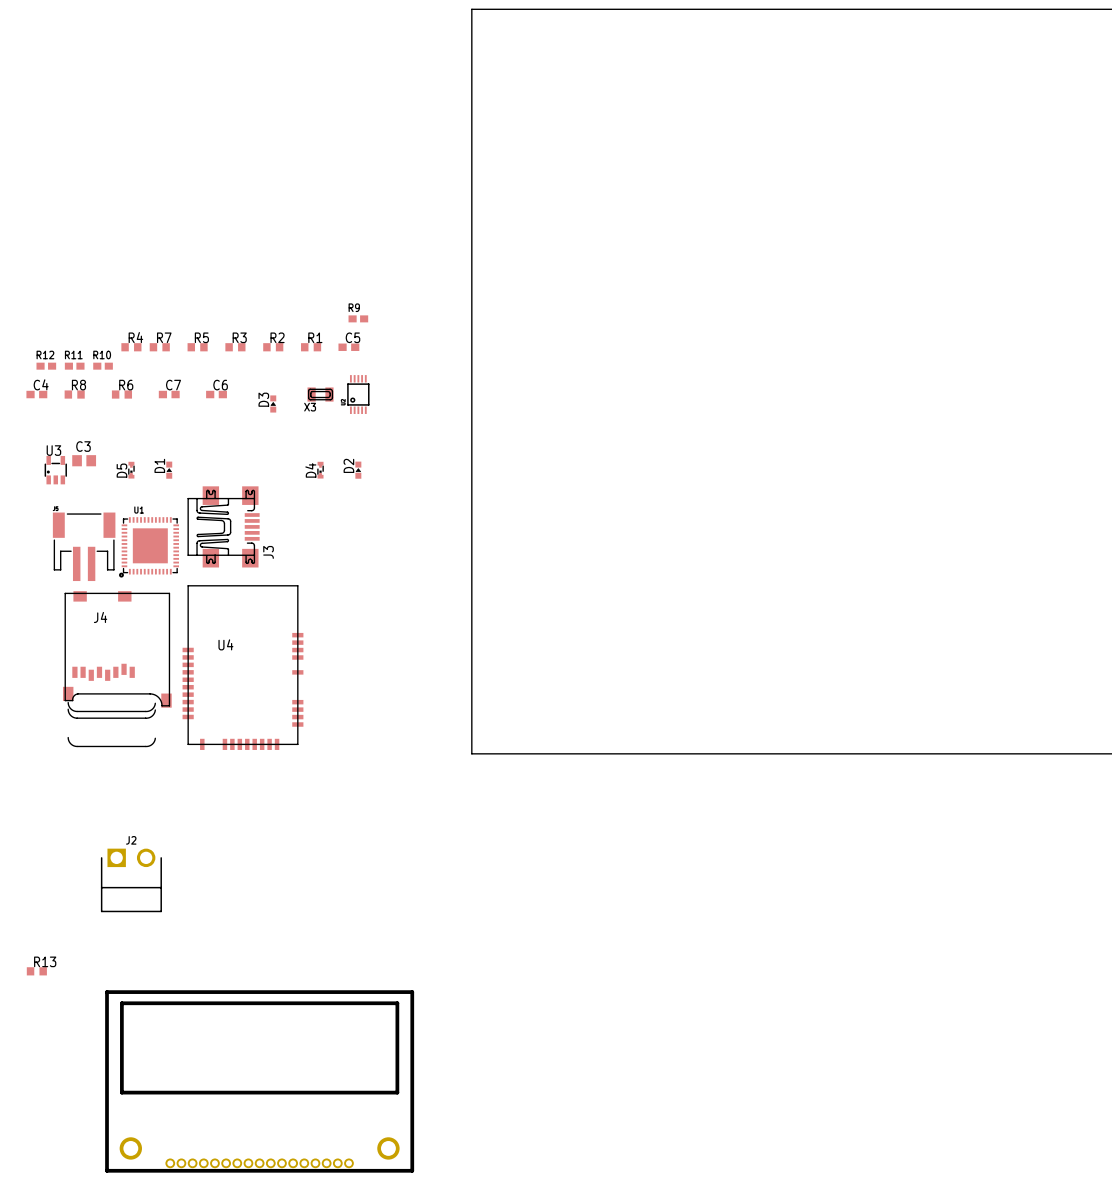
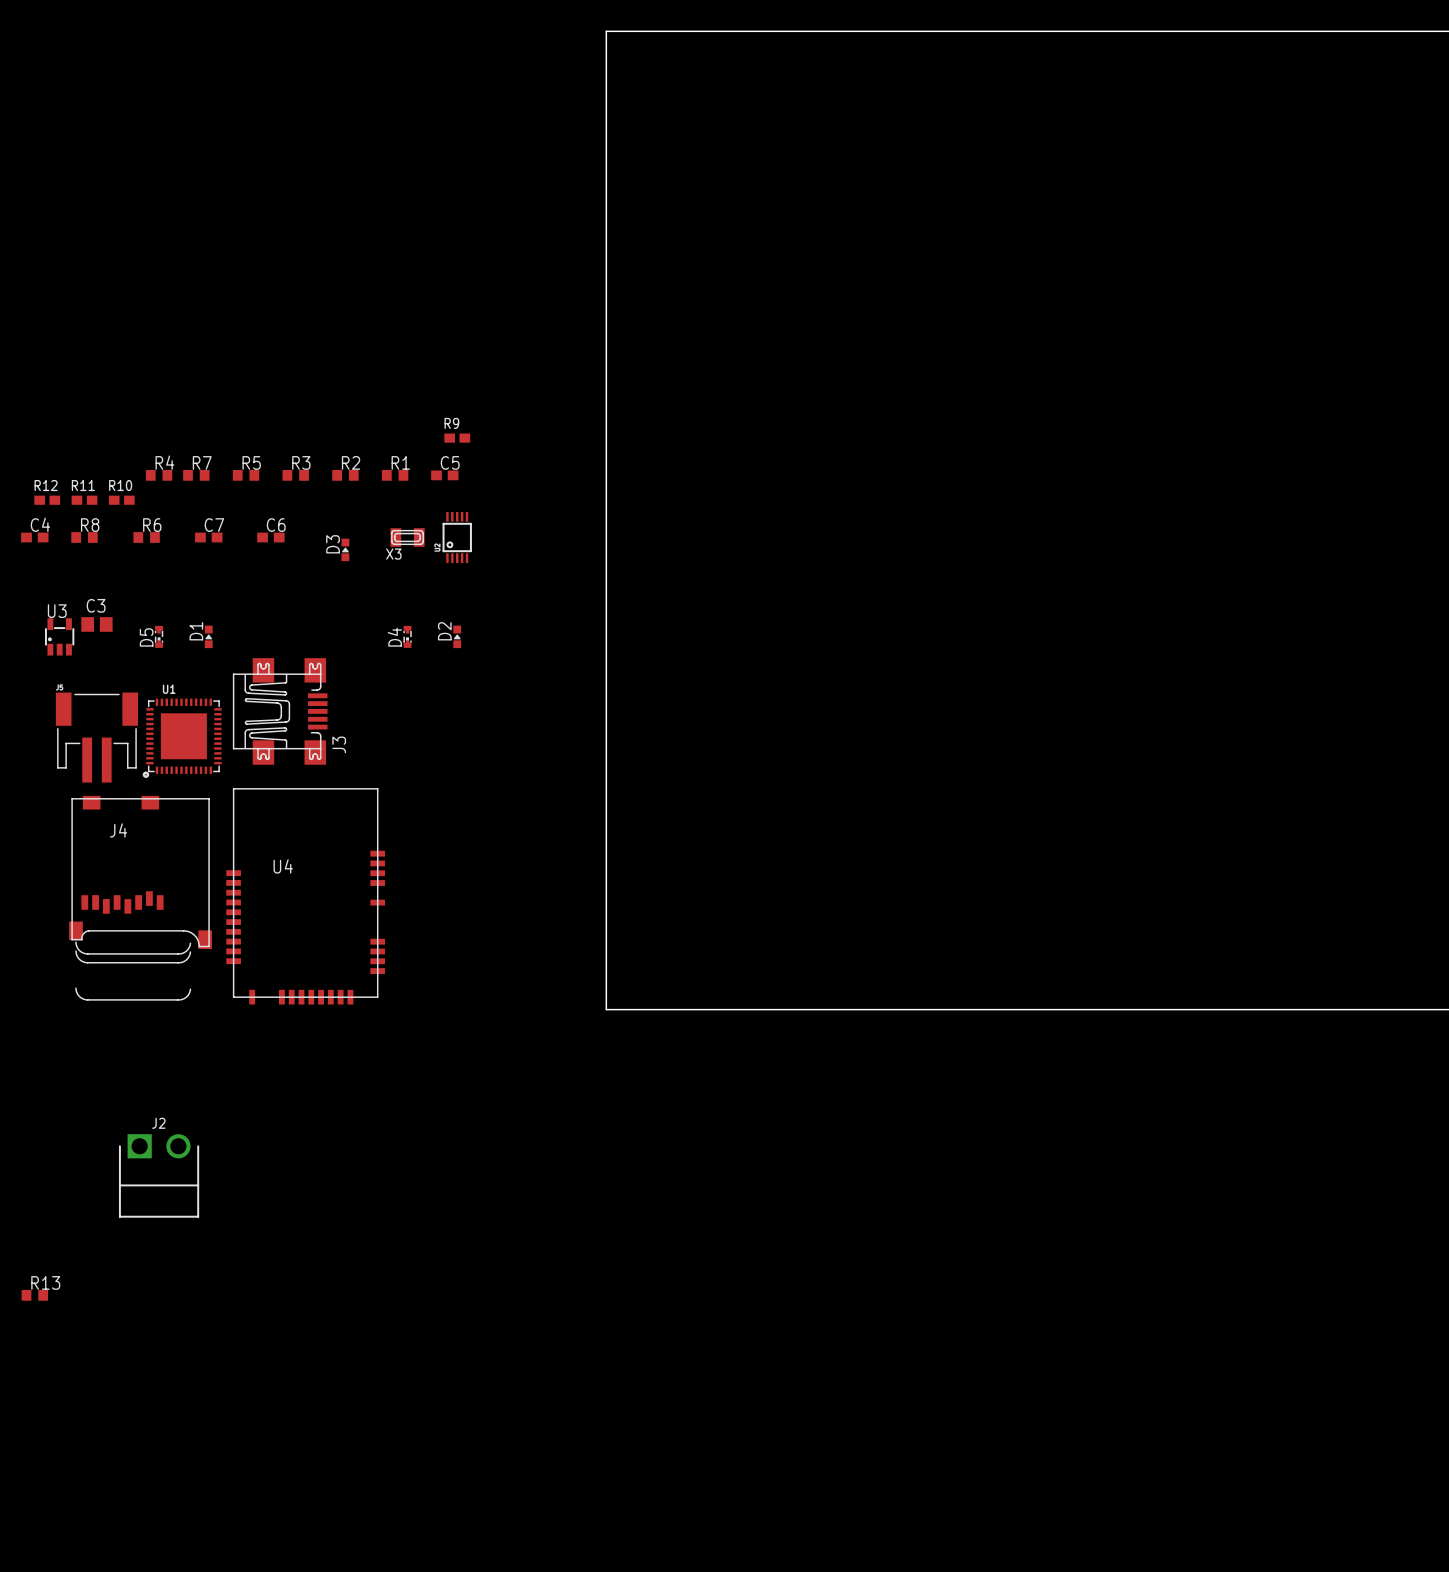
part: (259, 1081) -> none

